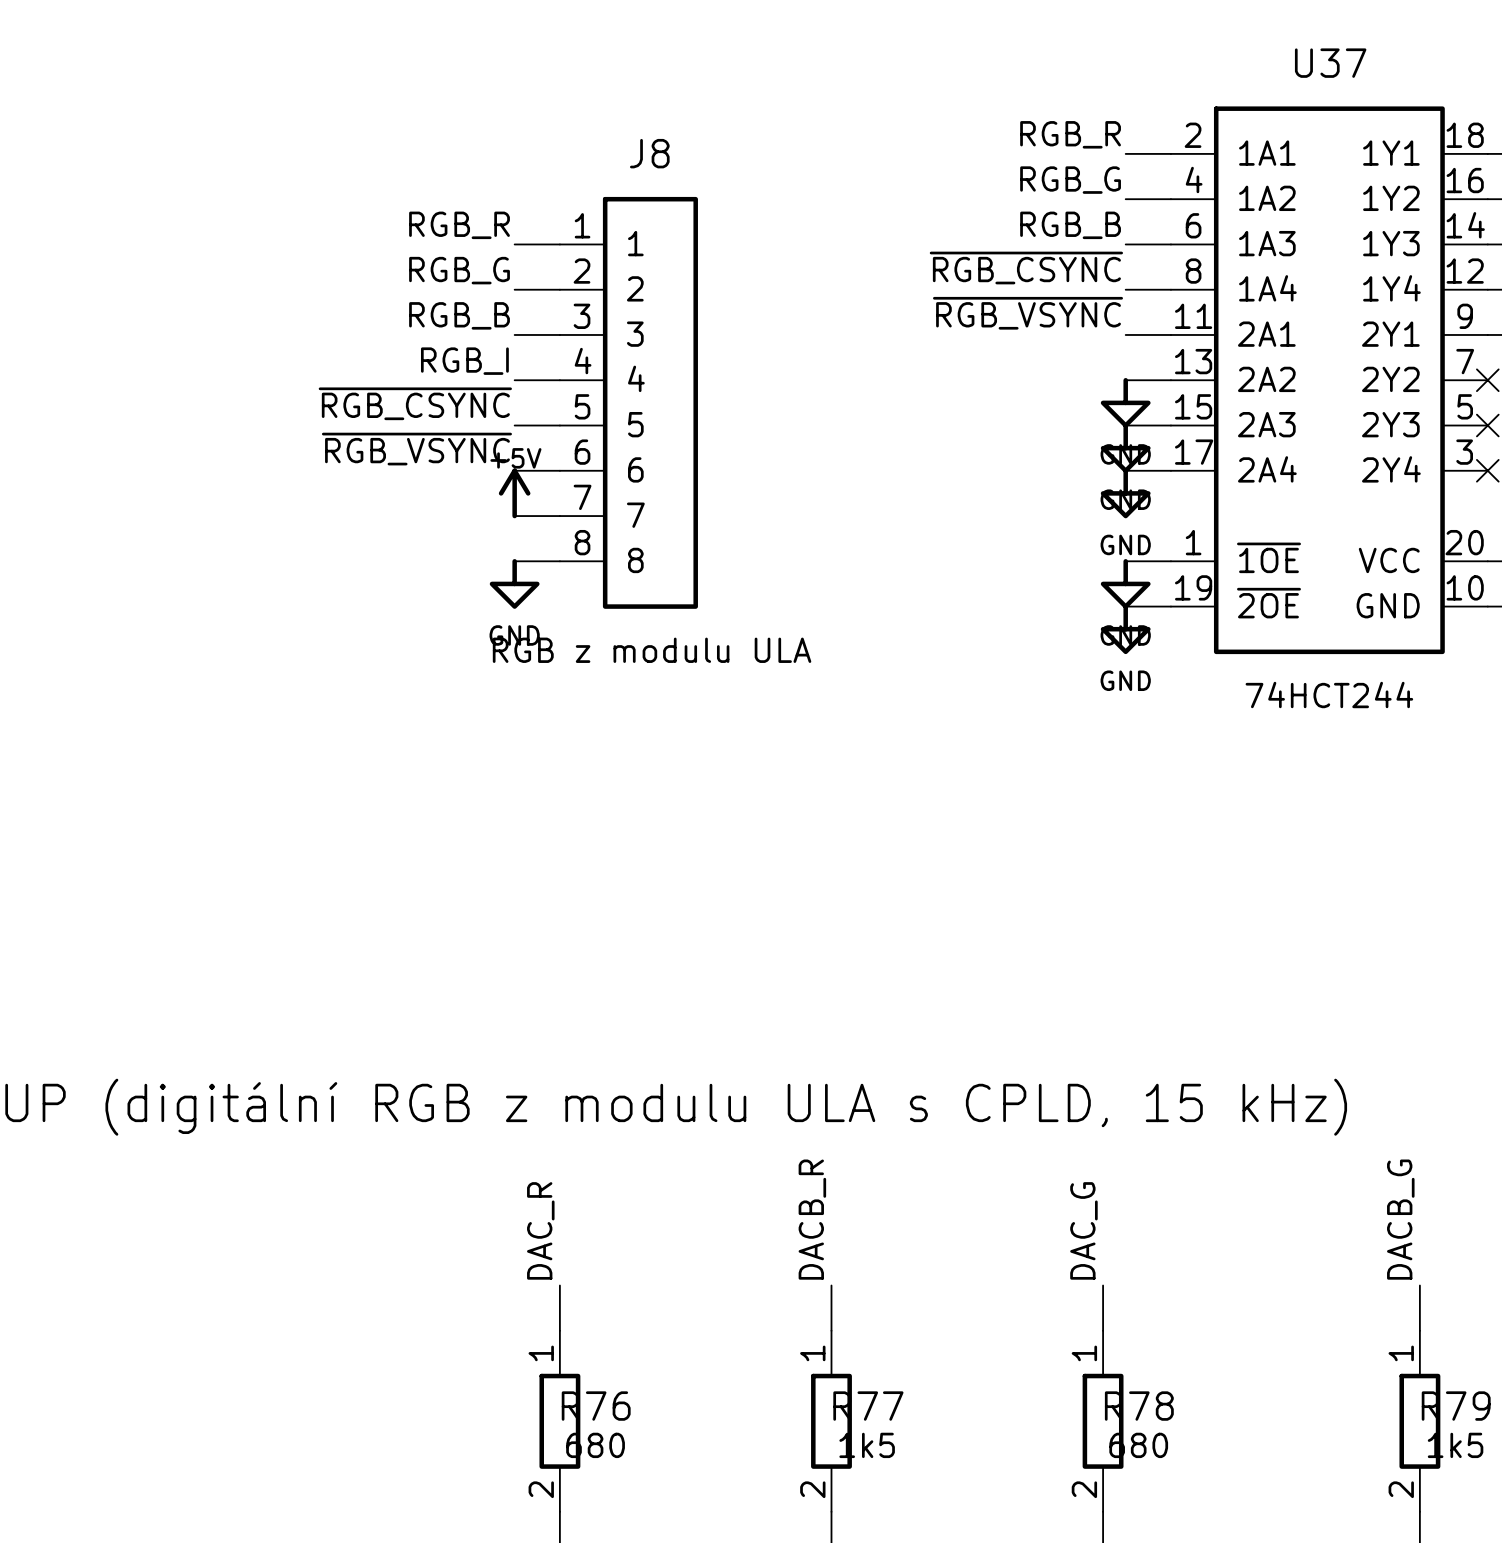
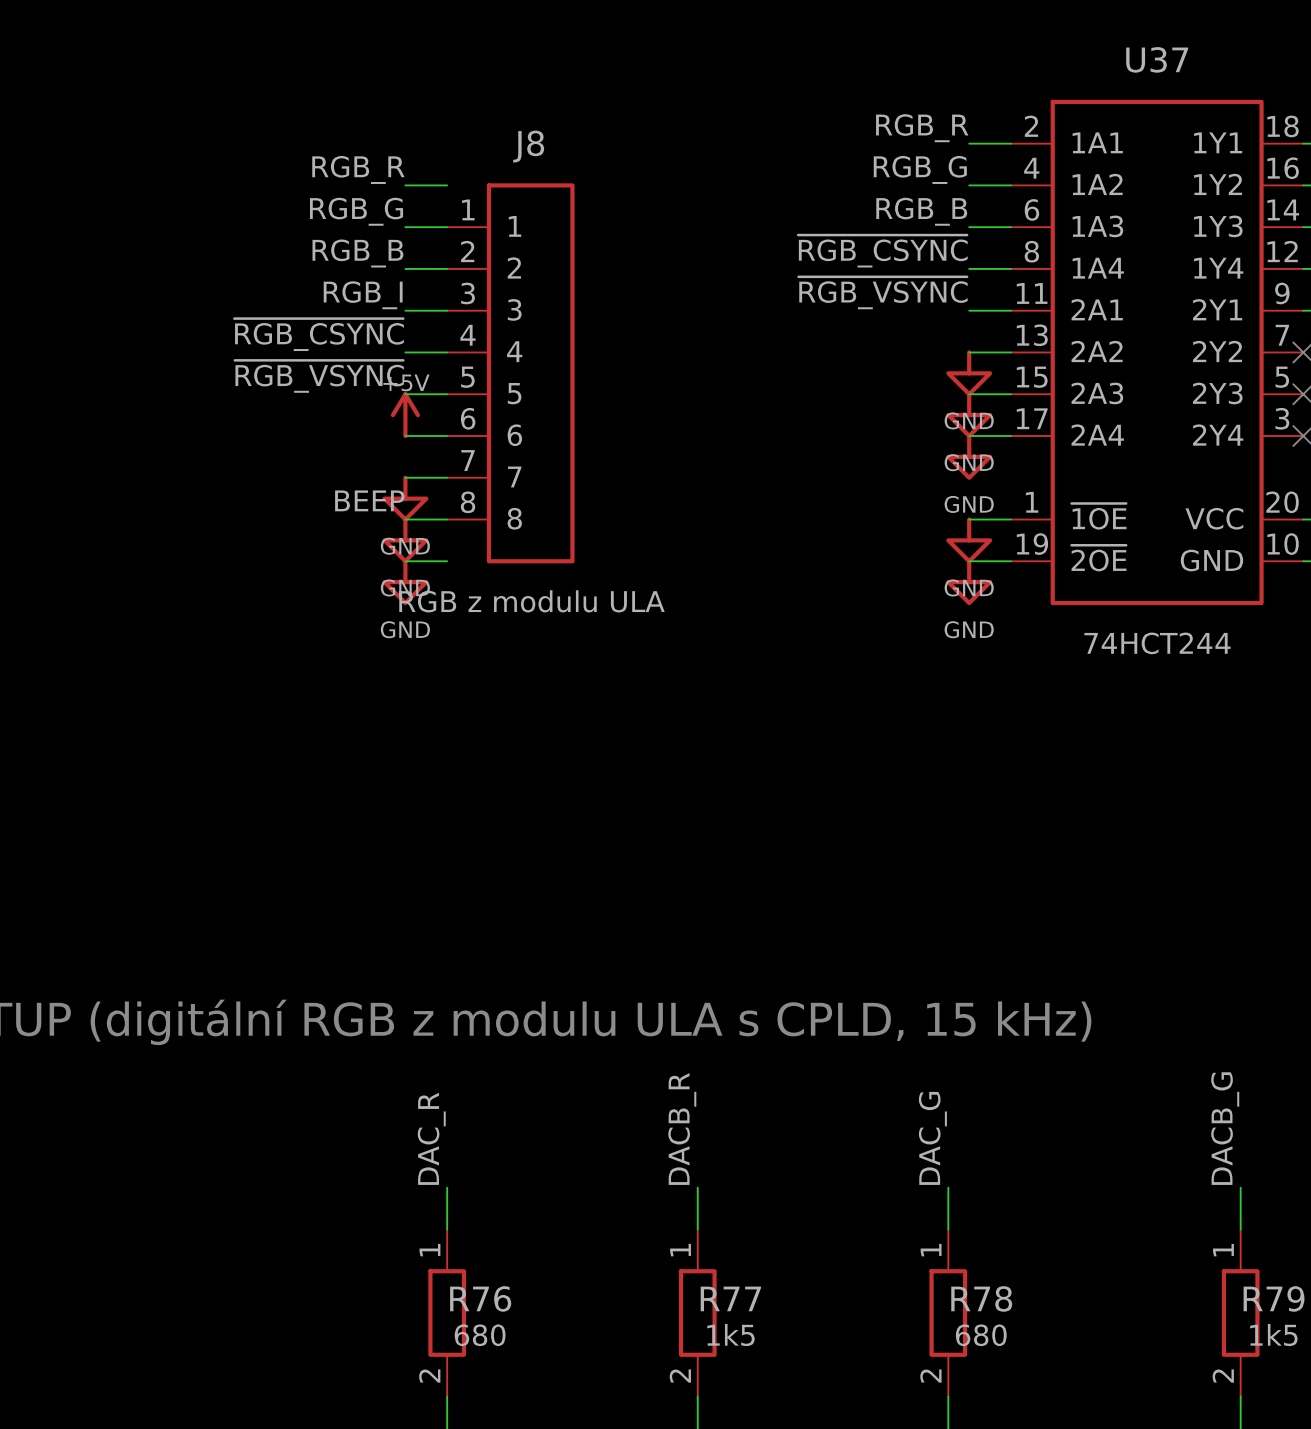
label: none -> RGB_R (358, 169)
wire: none -> (405, 185) (447, 185)
label: RGB_R (459, 225) -> RGB_G (356, 211)
label: RGB_G (459, 270) -> RGB_B (357, 253)
label: RGB_B (459, 315) -> RGB_I (363, 295)
label: RGB_I (464, 361) -> ~{RGB_CSYNC} (319, 334)
label: ~{RGB_CSYNC} (415, 403) -> ~{RGB_VSYNC} (319, 376)
label: ~{RGB_VSYNC} (416, 449) -> none
power symbol position: +5V (514, 493) -> +5V (405, 415)
power symbol: none -> GND (405, 498)
label: none -> BEEP (369, 500)
wire: none -> (405, 561) (447, 561)
power symbol: none -> GND (405, 582)

